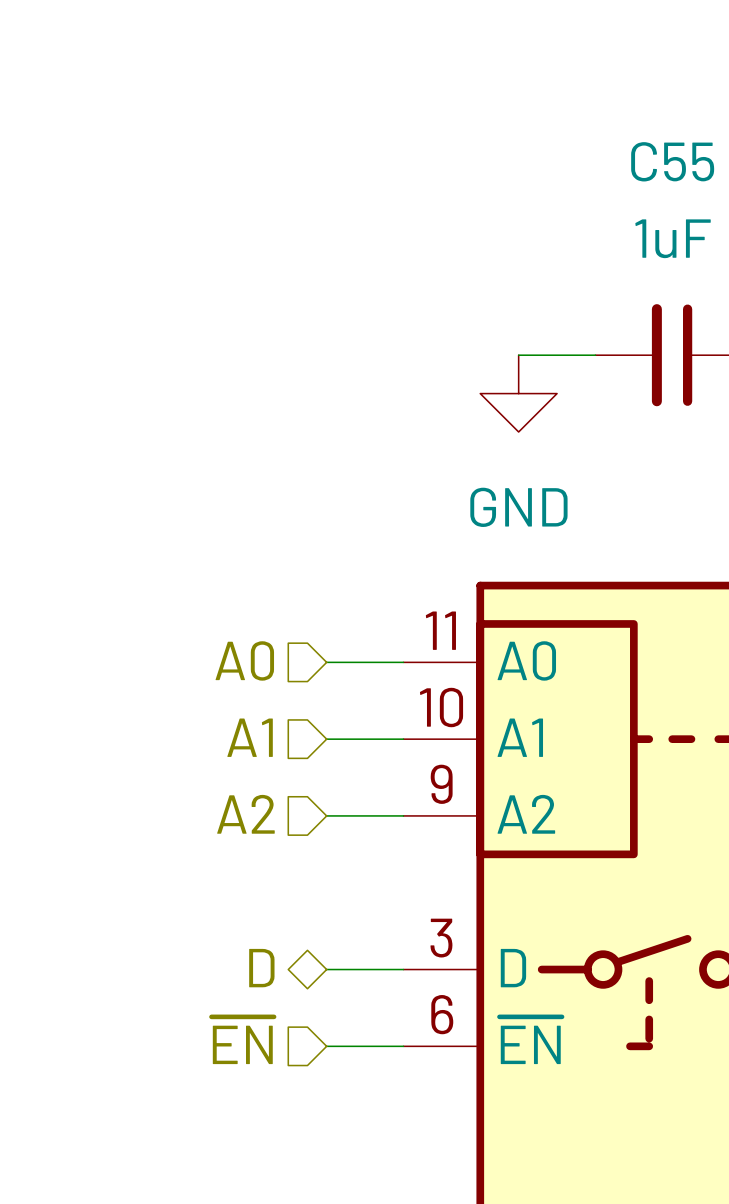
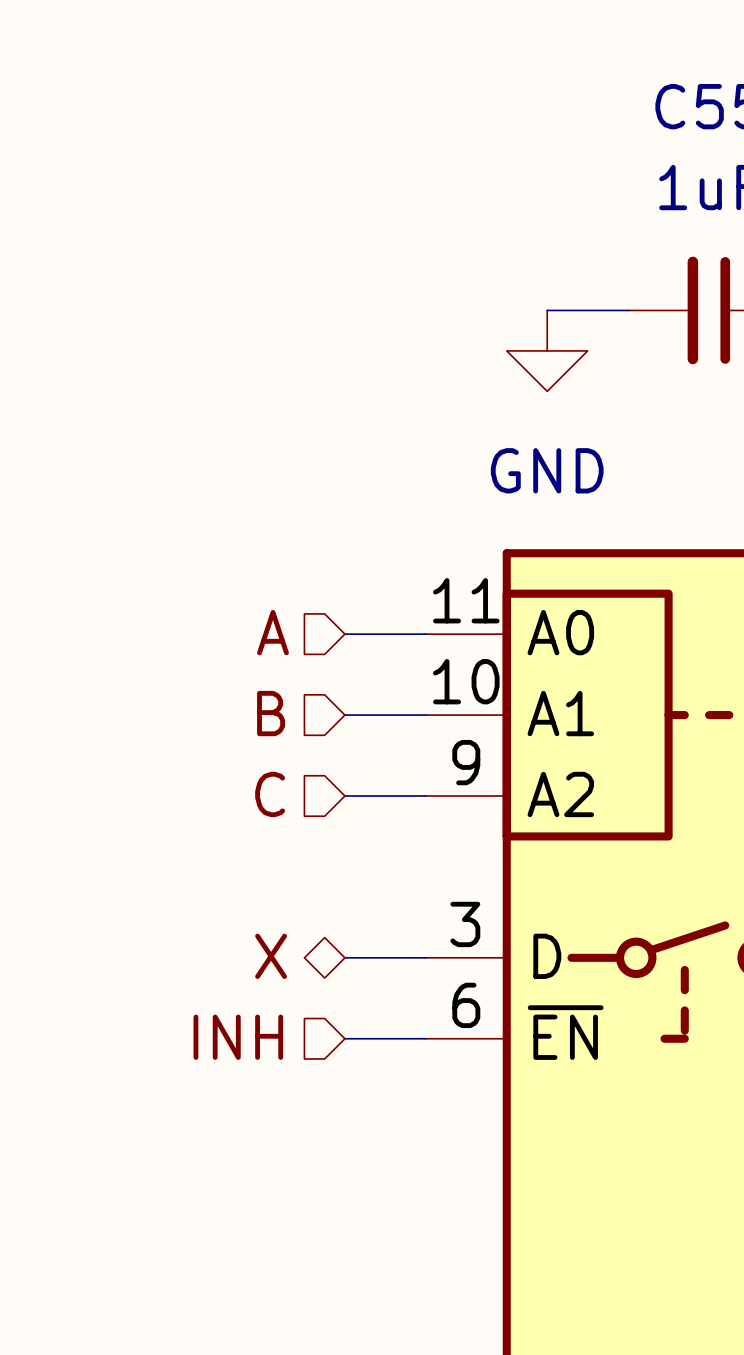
hierarchical label: A0 (244, 660) -> A (272, 632)
hierarchical label: A1 (250, 737) -> B (271, 713)
hierarchical label: A2 (245, 814) -> C (270, 794)
hierarchical label: D (261, 968) -> X (271, 956)
hierarchical label: ~{EN} (242, 1040) -> INH (238, 1037)

